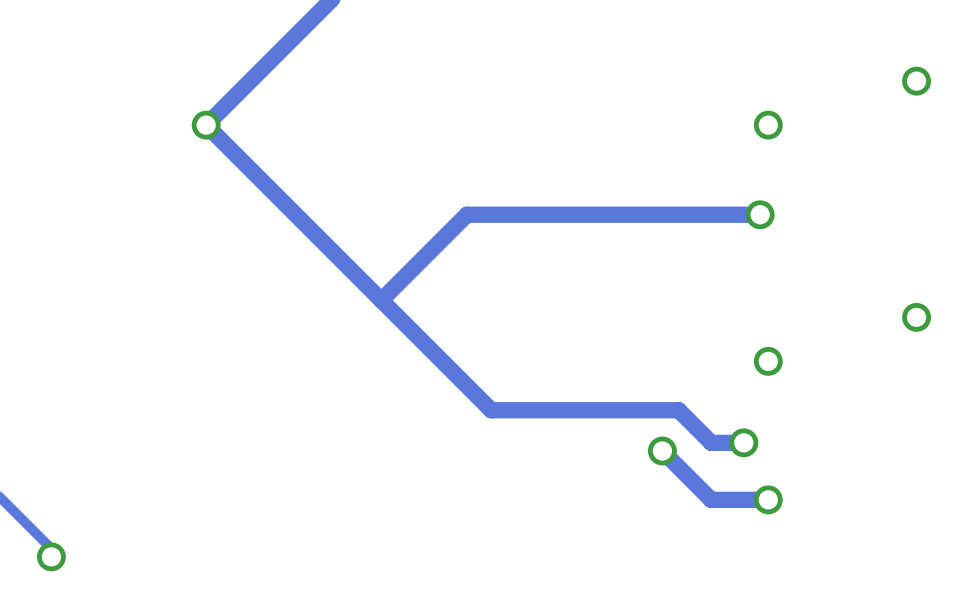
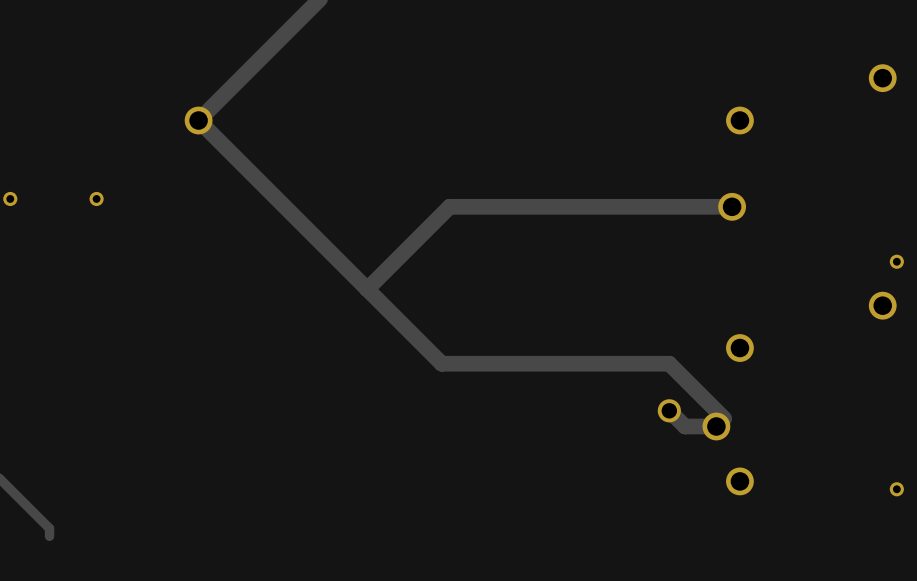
via: none -> (10, 198)
via: none -> (96, 198)
via: none -> (896, 261)
track: (458, 377) (491, 410) (678, 410) (694, 426) -> (441, 363) (669, 363) (724, 418)
via: none -> (669, 410)
track: (662, 450) (711, 499) (768, 499) -> none
via: (662, 450) -> none
via: none -> (896, 489)
via: (51, 556) -> none

